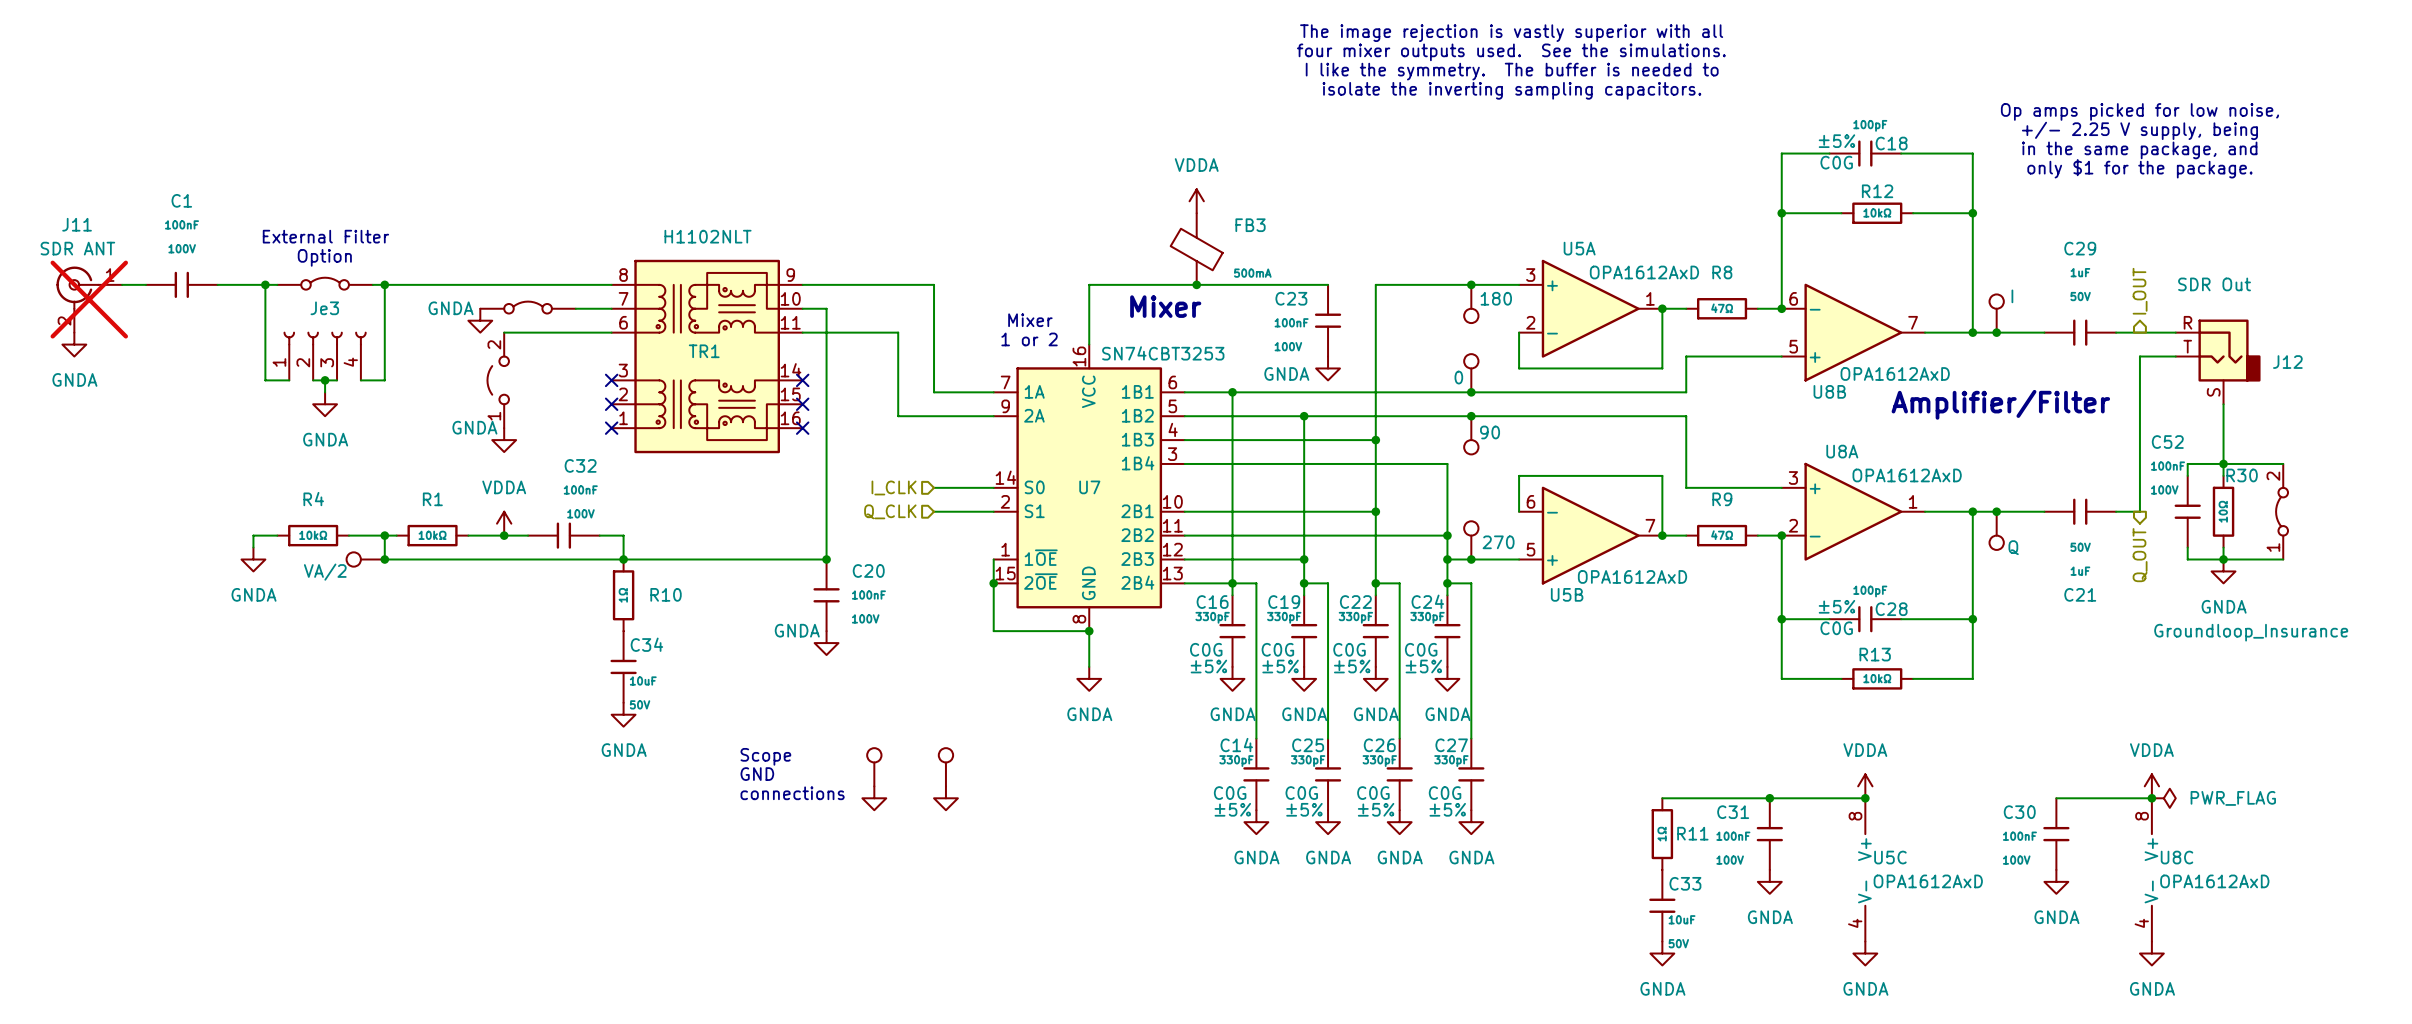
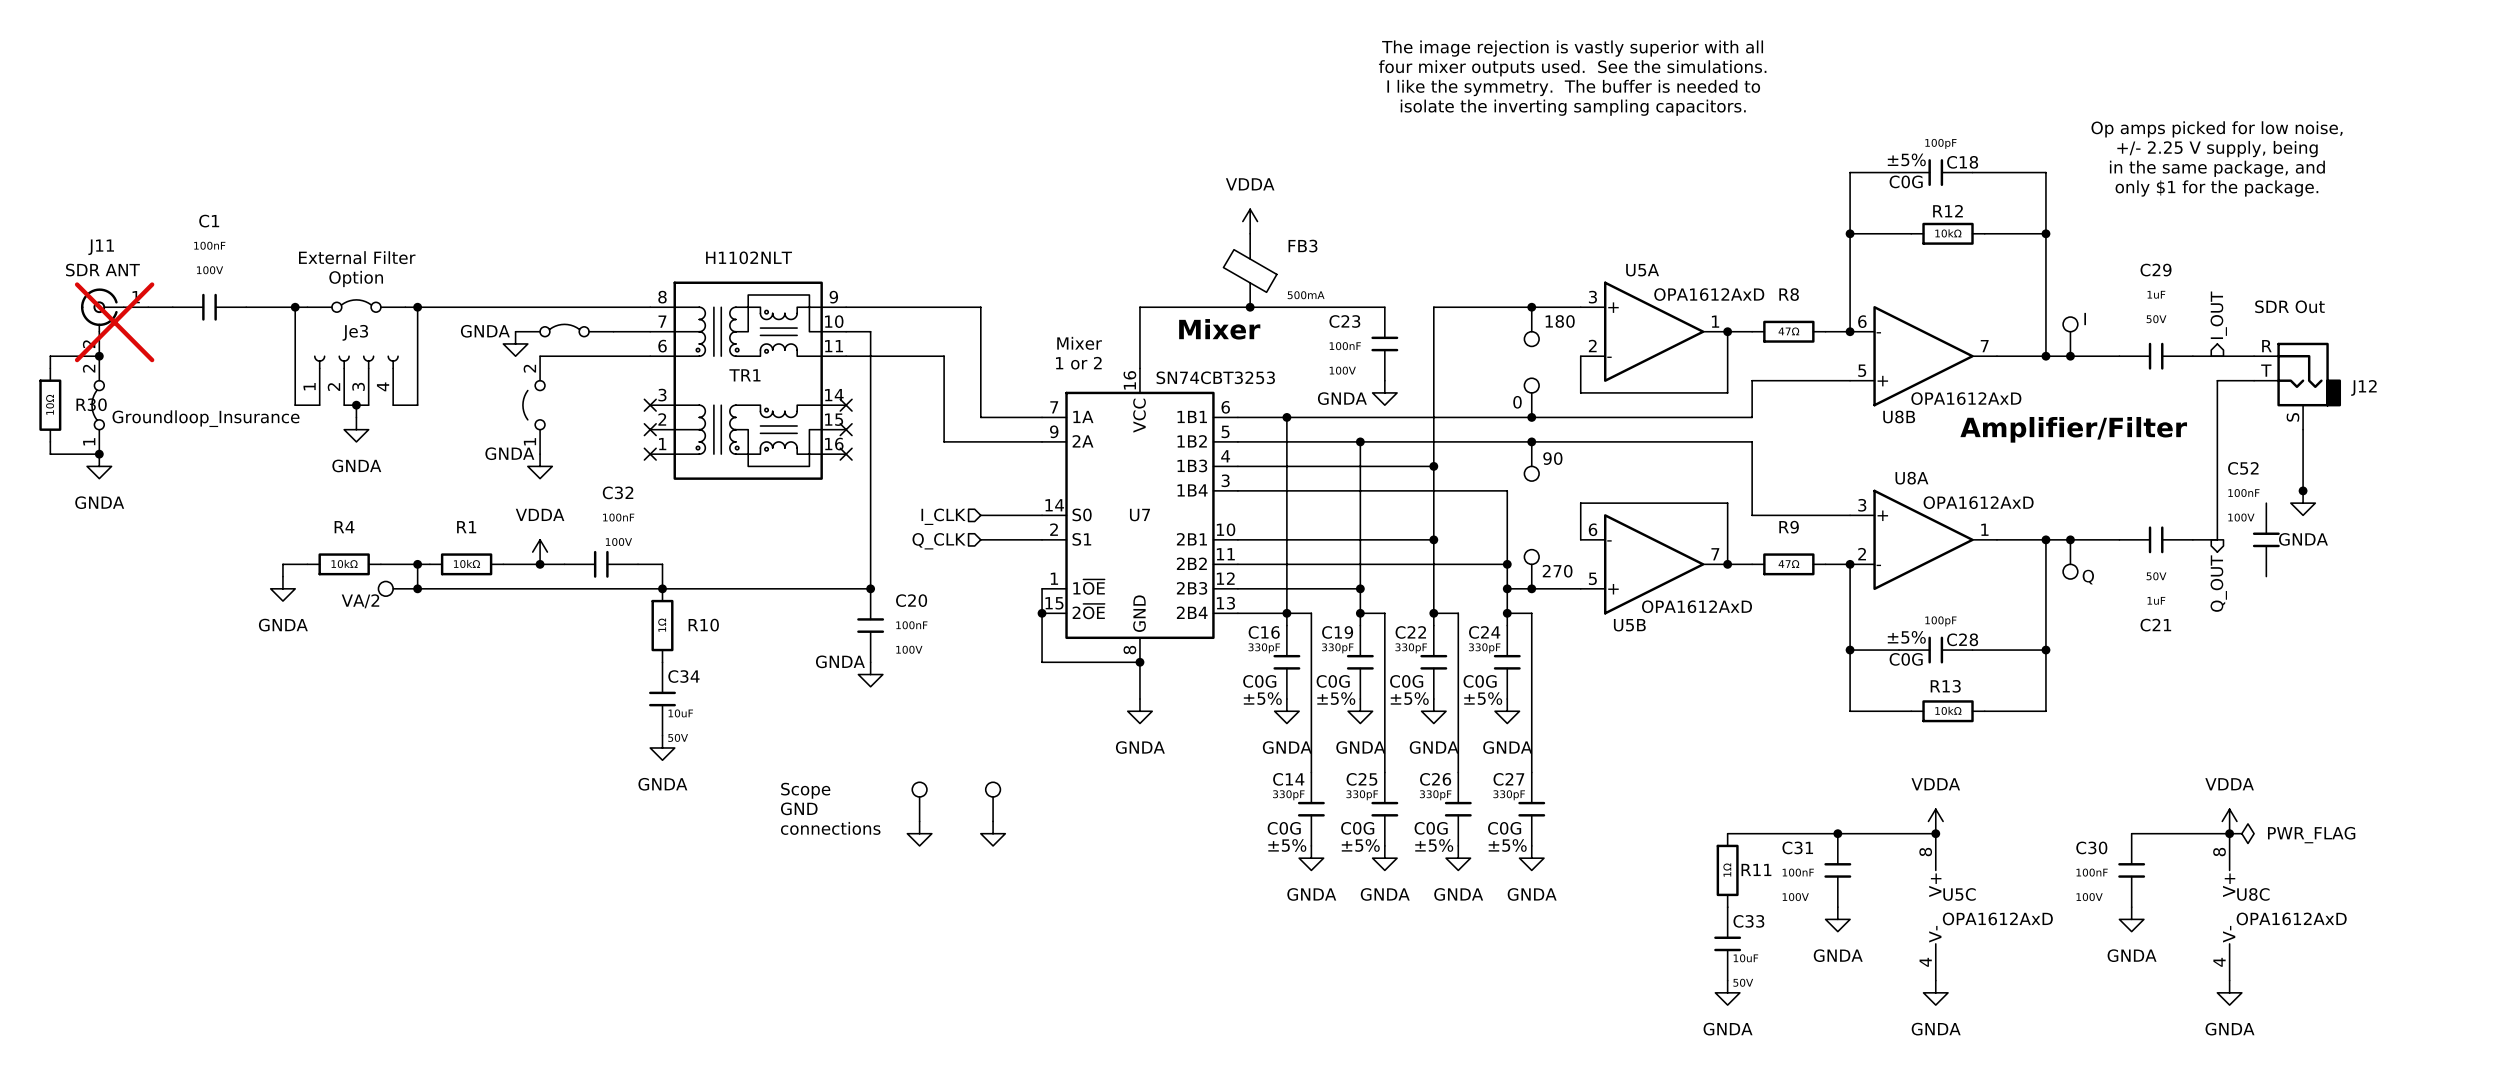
wire: none -> (99, 356) (50, 356) (50, 368)
junction: none -> (99, 356)
power symbol position: GNDA (74, 344) -> GNDA (99, 466)
part: none -> Groundloop_Insurance (98, 405)
wire: none -> (50, 441) (50, 454) (99, 454)
junction: none -> (99, 454)
wire: (2283, 463) (2187, 463) (2187, 475) -> none
R30 name position: R30 (2242, 475) -> R30 (91, 404)
R30 position: (2223, 511) -> (50, 405)
part: Groundloop_Insurance (2282, 511) -> none
wire: (2187, 547) (2187, 559) (2283, 559) -> none
wire: (2223, 547) (2223, 559) -> none
junction: (2223, 559) -> none
power symbol position: GNDA (2223, 571) -> GNDA (2303, 503)

